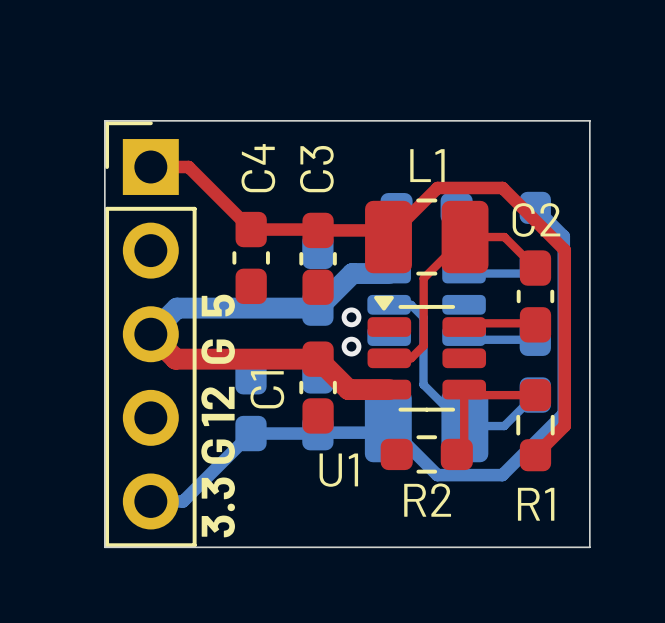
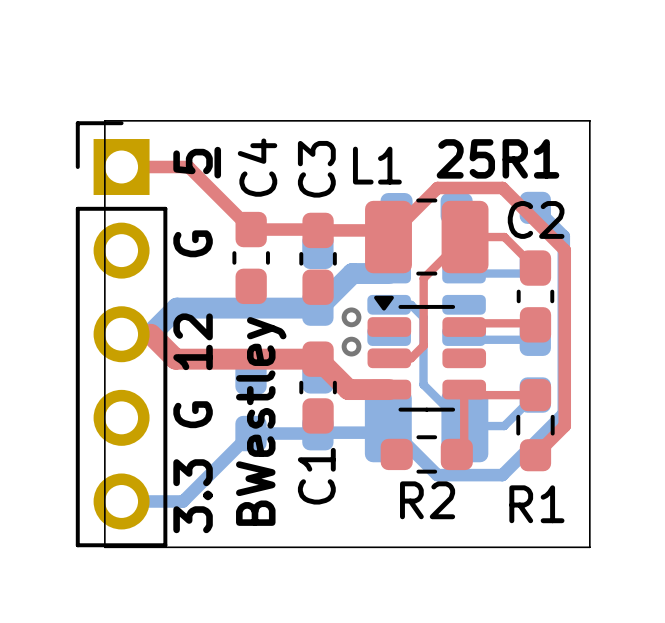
line: none -> (217, 150) (217, 175)
text: none -> 25R1 (497, 158)
L1 name position: L1 (427, 165) -> L1 (377, 165)
part position: (150, 334) -> (121, 334)
C1 name position: C1 (267, 389) -> C1 (316, 476)
text position: 3.3 G 12 G 5 (218, 416) -> 3.3 G 12 G 5 (193, 341)
text: none -> BWestley (261, 421)
U1 name: U1 (338, 470) -> none

